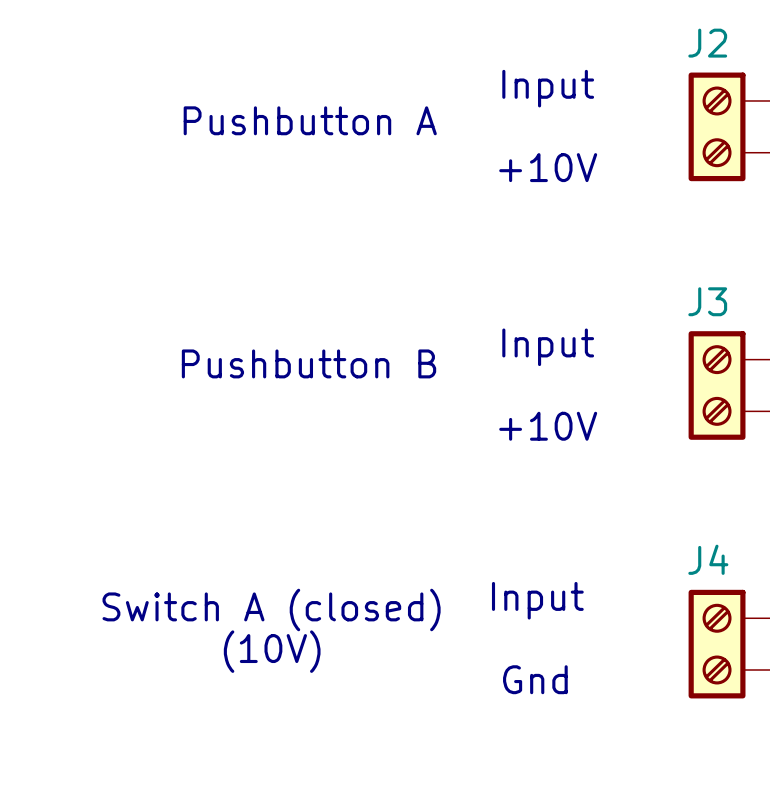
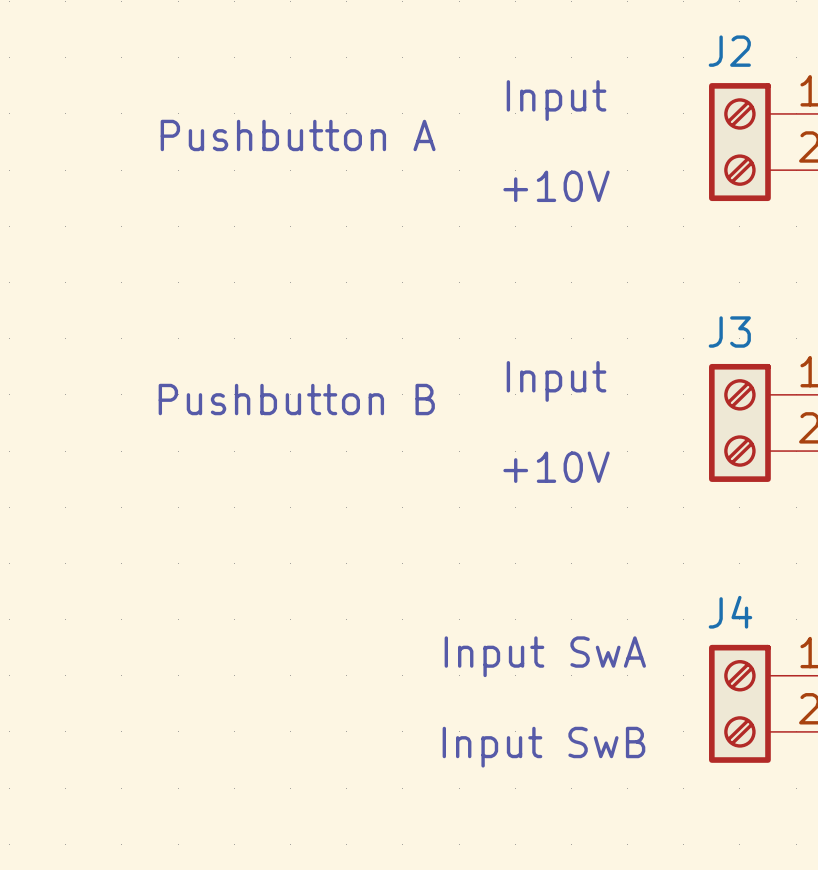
text: Input (537, 600) -> Input SwA (545, 656)
text: Switch A (closed) (271, 609) -> none
text: (10V) (272, 651) -> none
text: Gnd (535, 679) -> Input SwB (543, 747)

